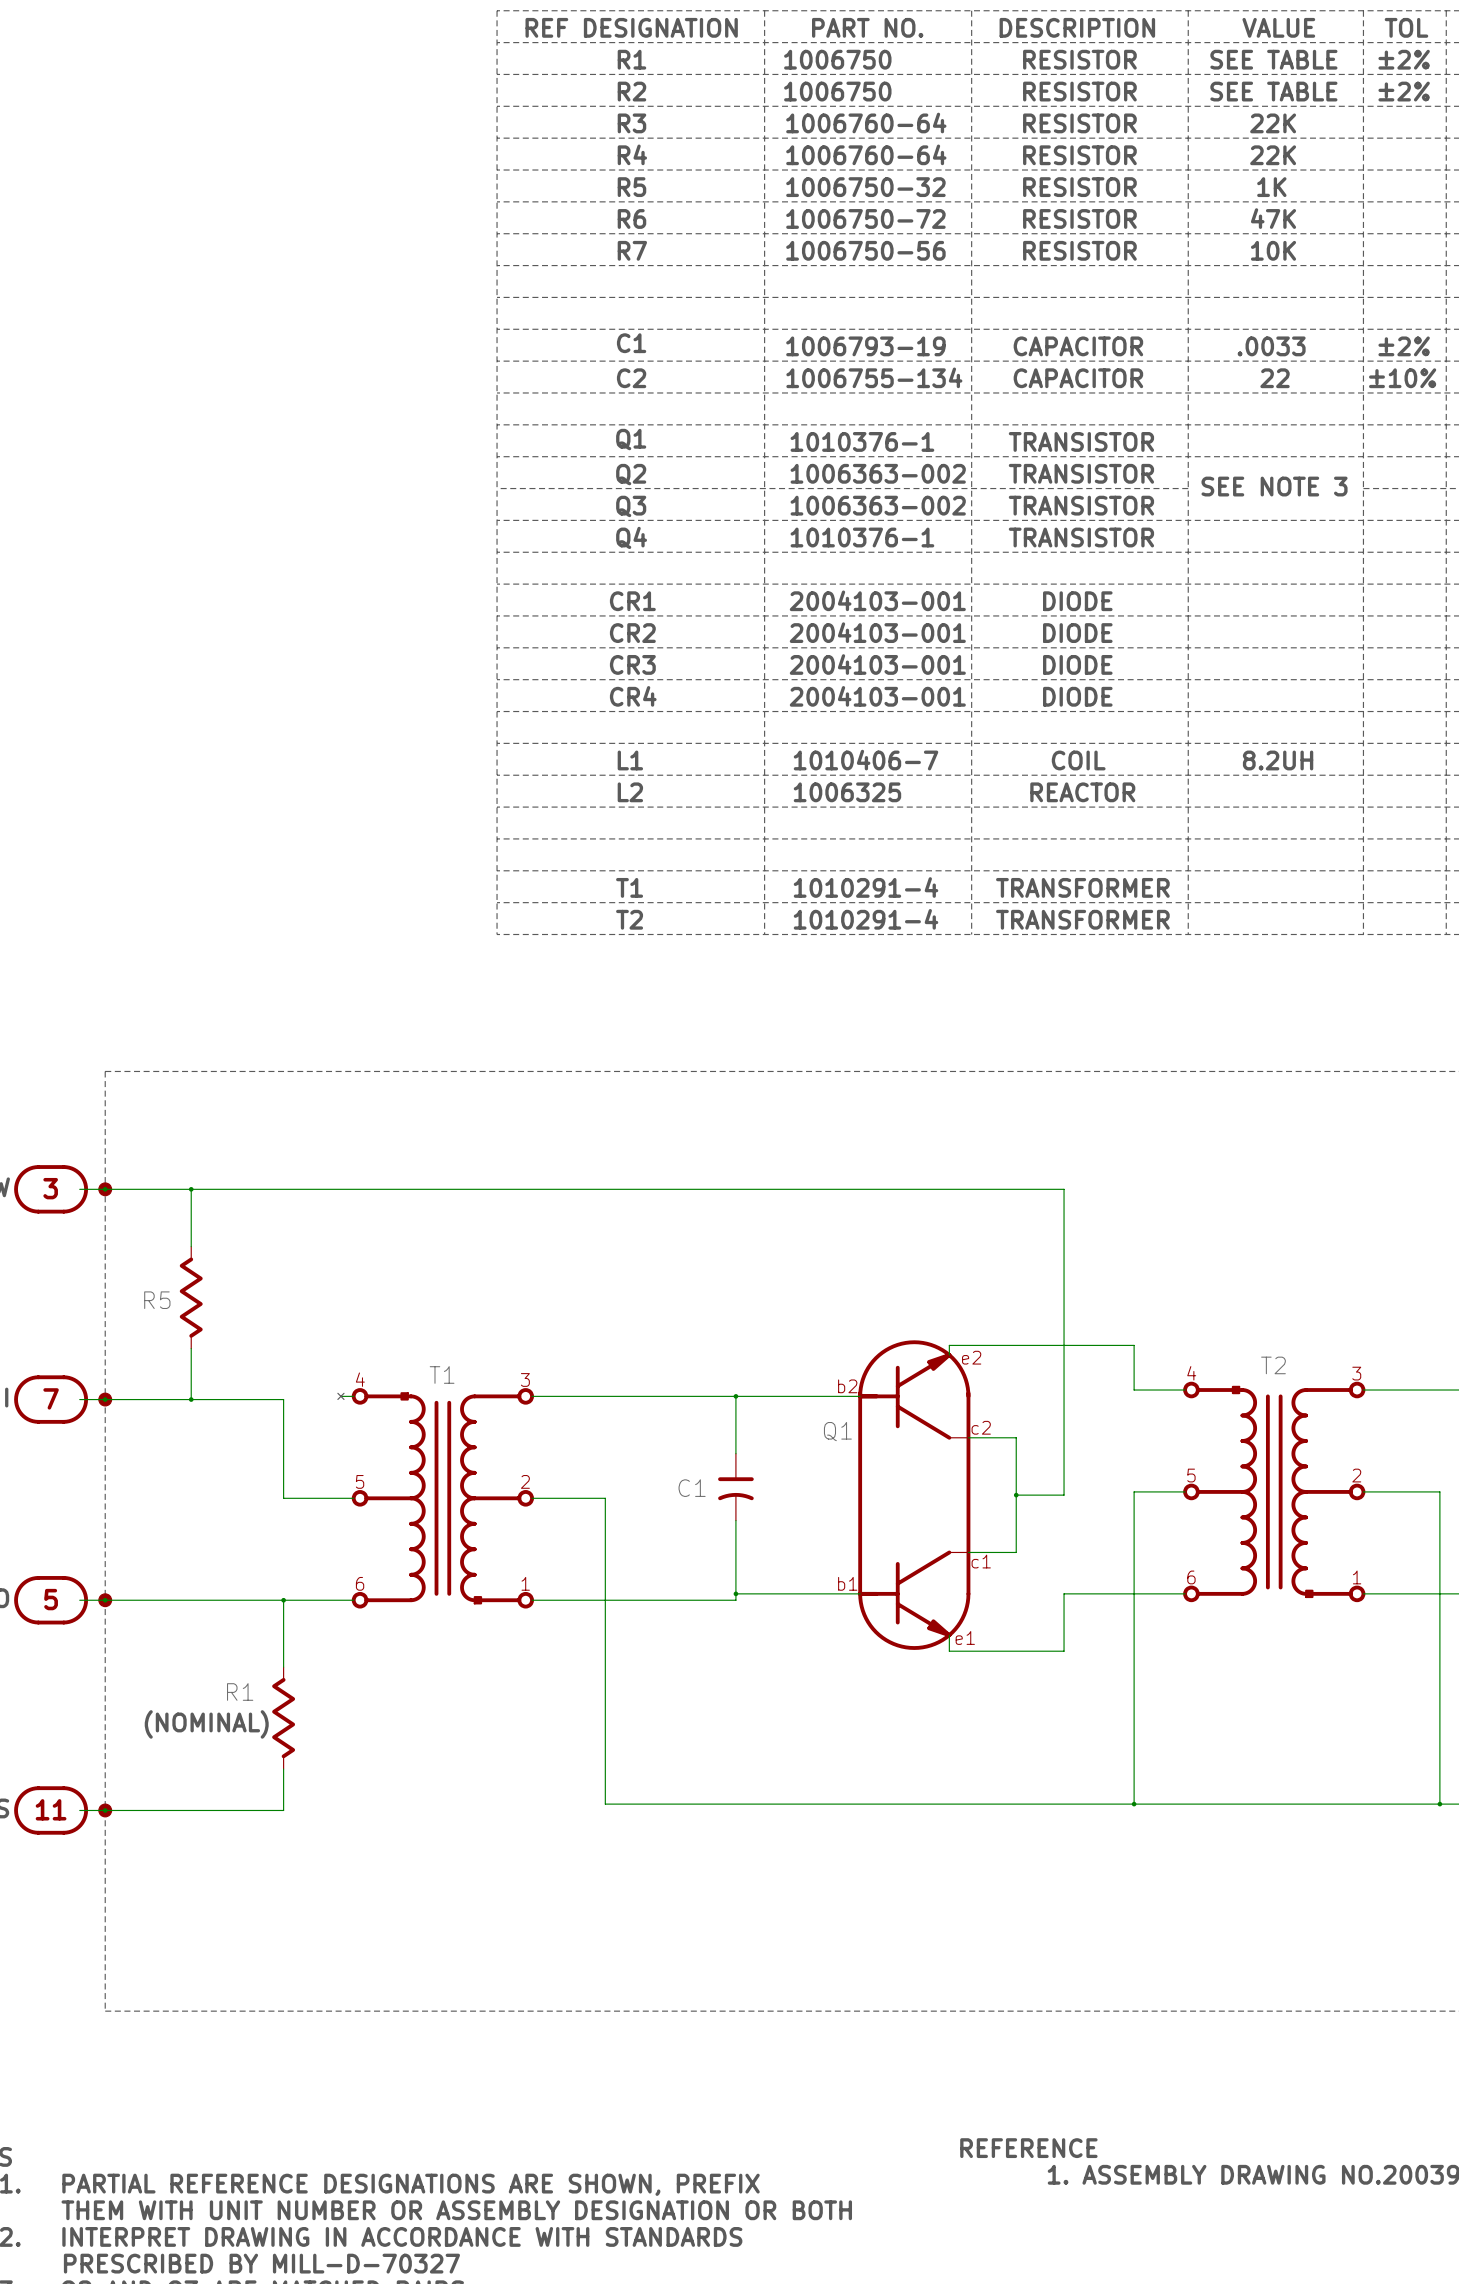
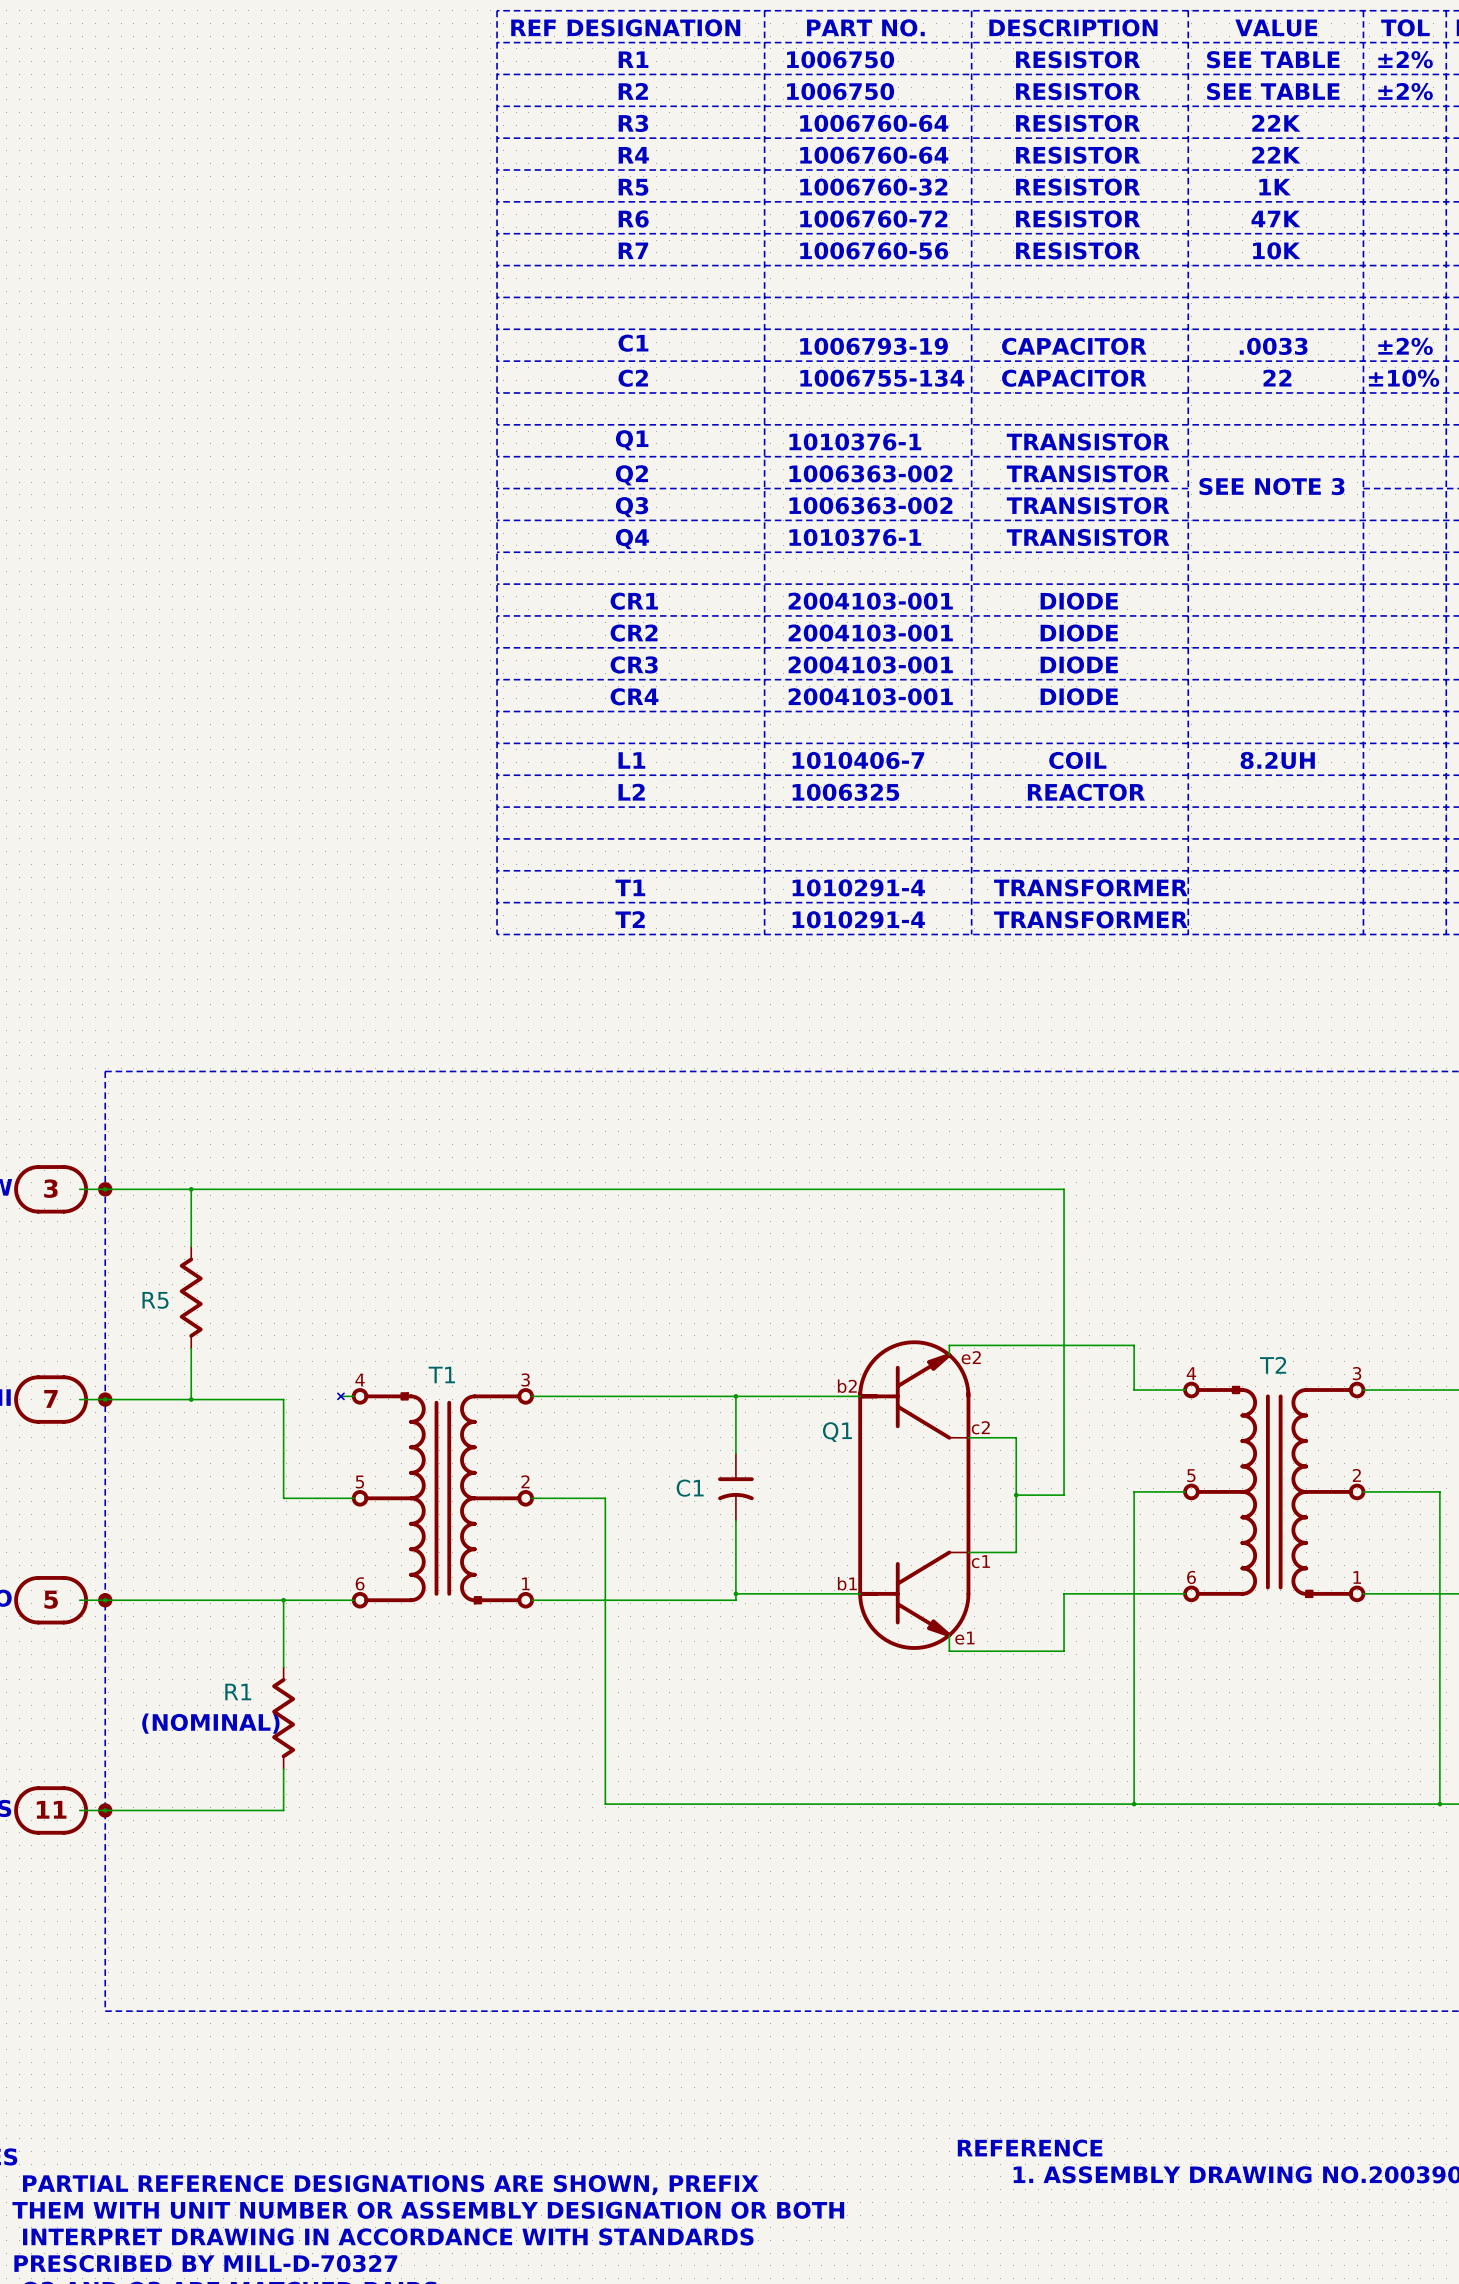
text: 1006750-32 (865, 187) -> 1006760-32 (873, 187)
text: 1006750-72 (865, 218) -> 1006760-72 (873, 218)
text: 1006750-56 (865, 250) -> 1006760-56 (874, 250)

